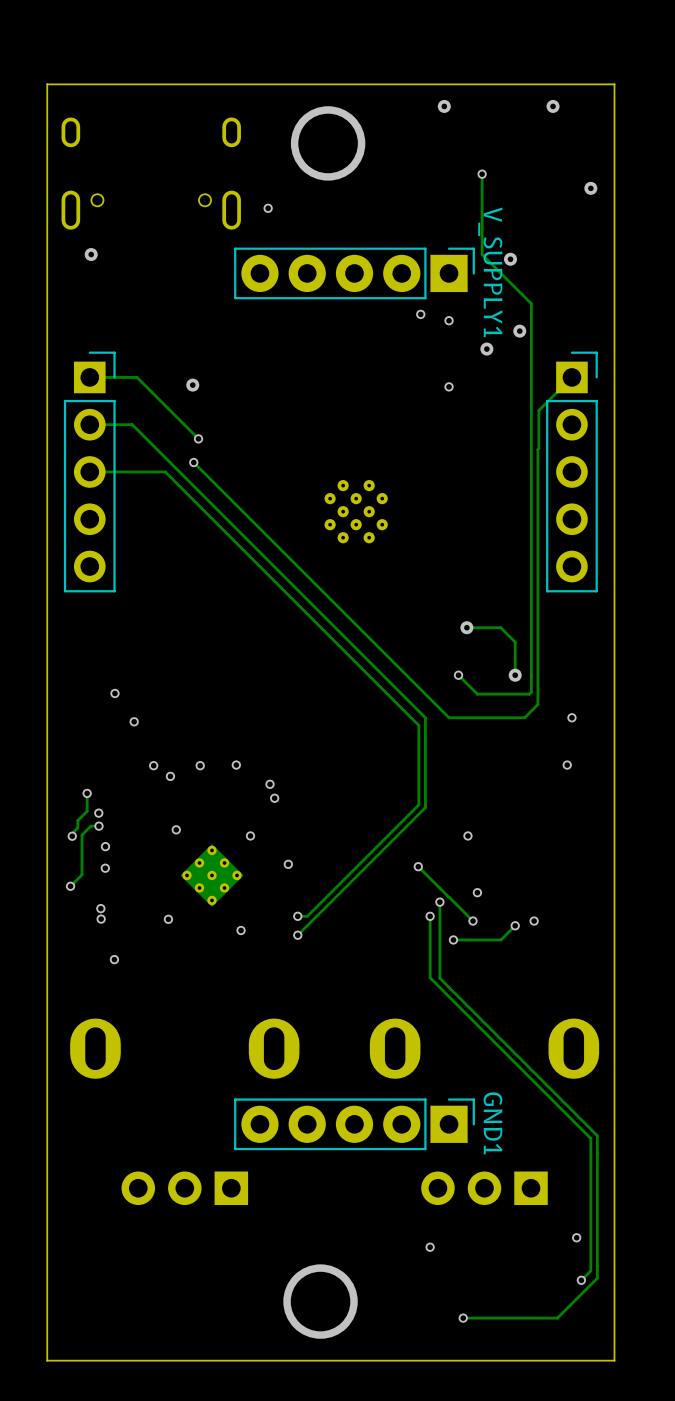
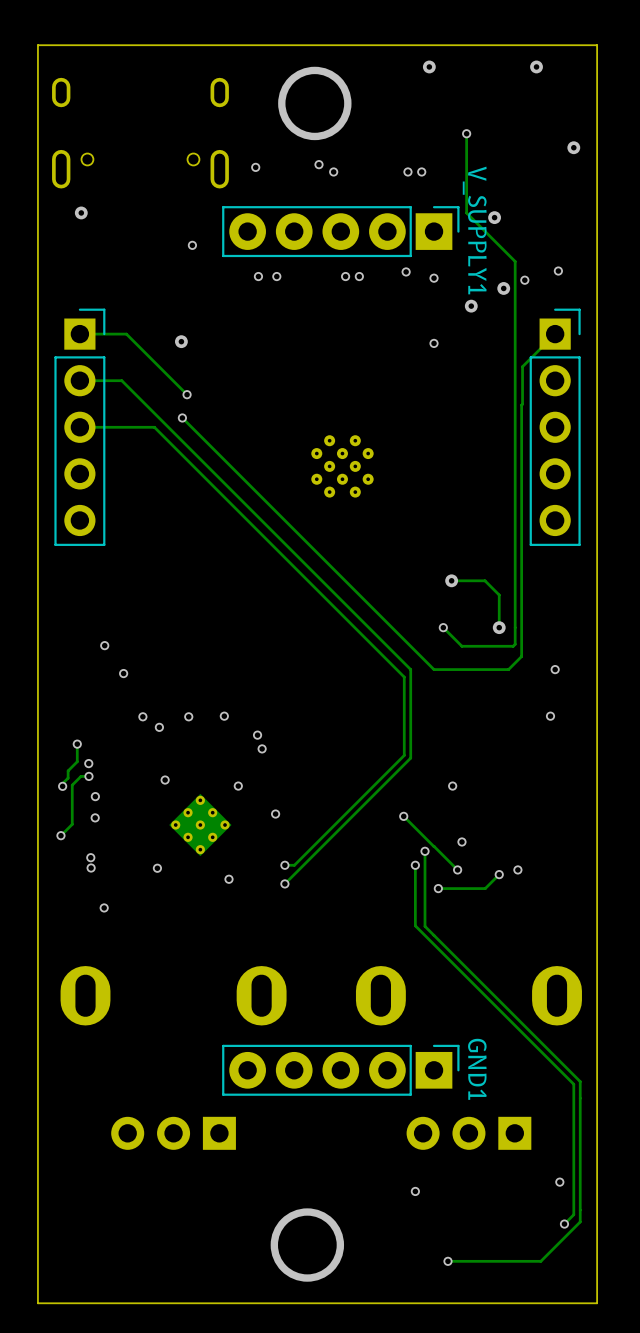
via: none -> (318, 164)
via: none -> (333, 171)
via: none -> (407, 171)
via: none -> (421, 171)
via: none -> (192, 245)
via: none -> (558, 271)
via: none -> (258, 276)
via: none -> (276, 276)
via: none -> (345, 276)
via: none -> (359, 276)
via: none -> (524, 280)

